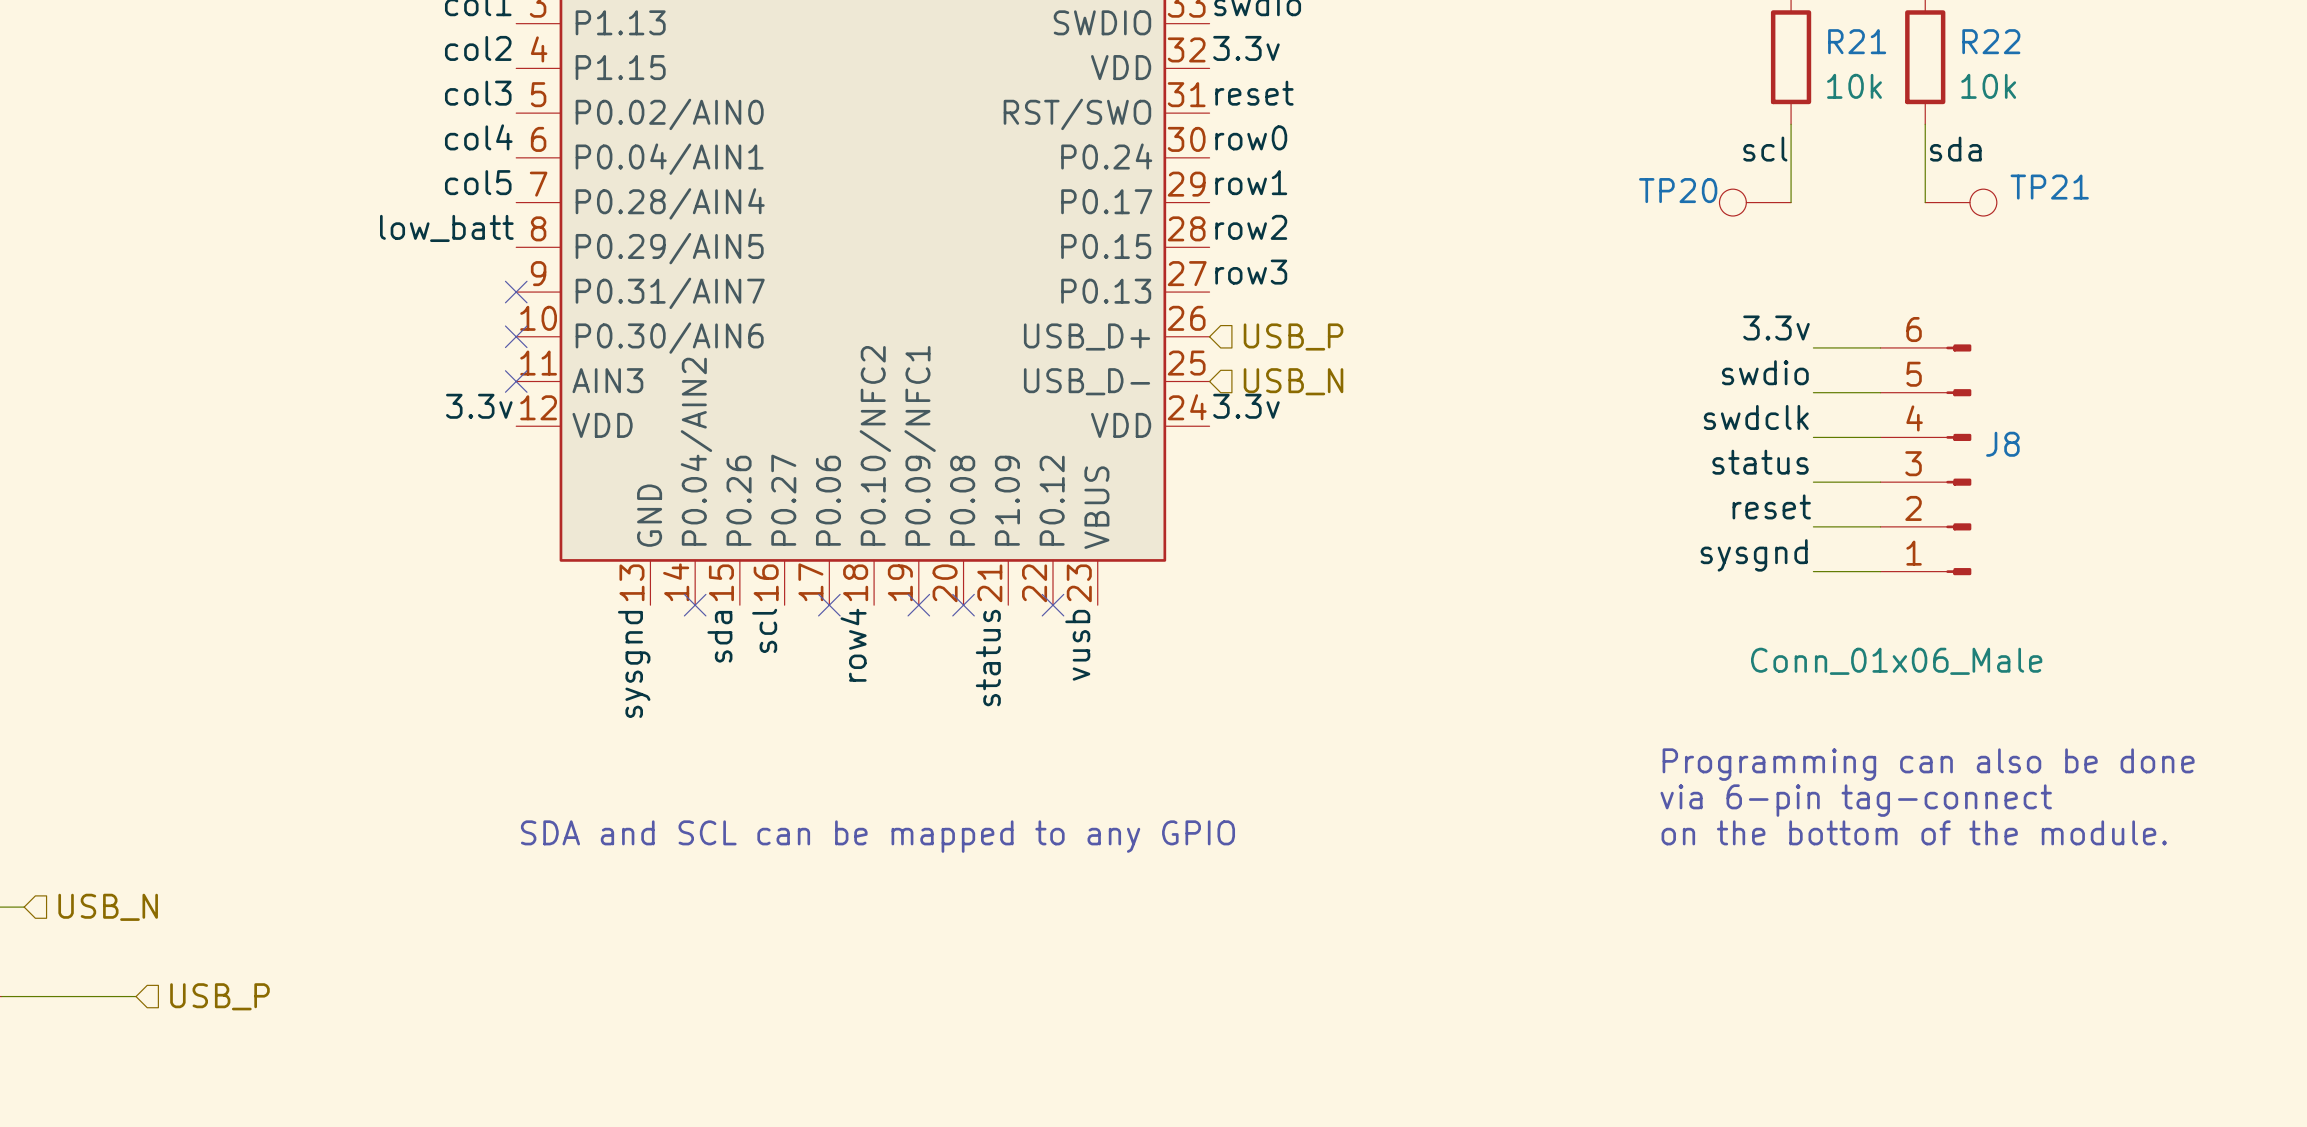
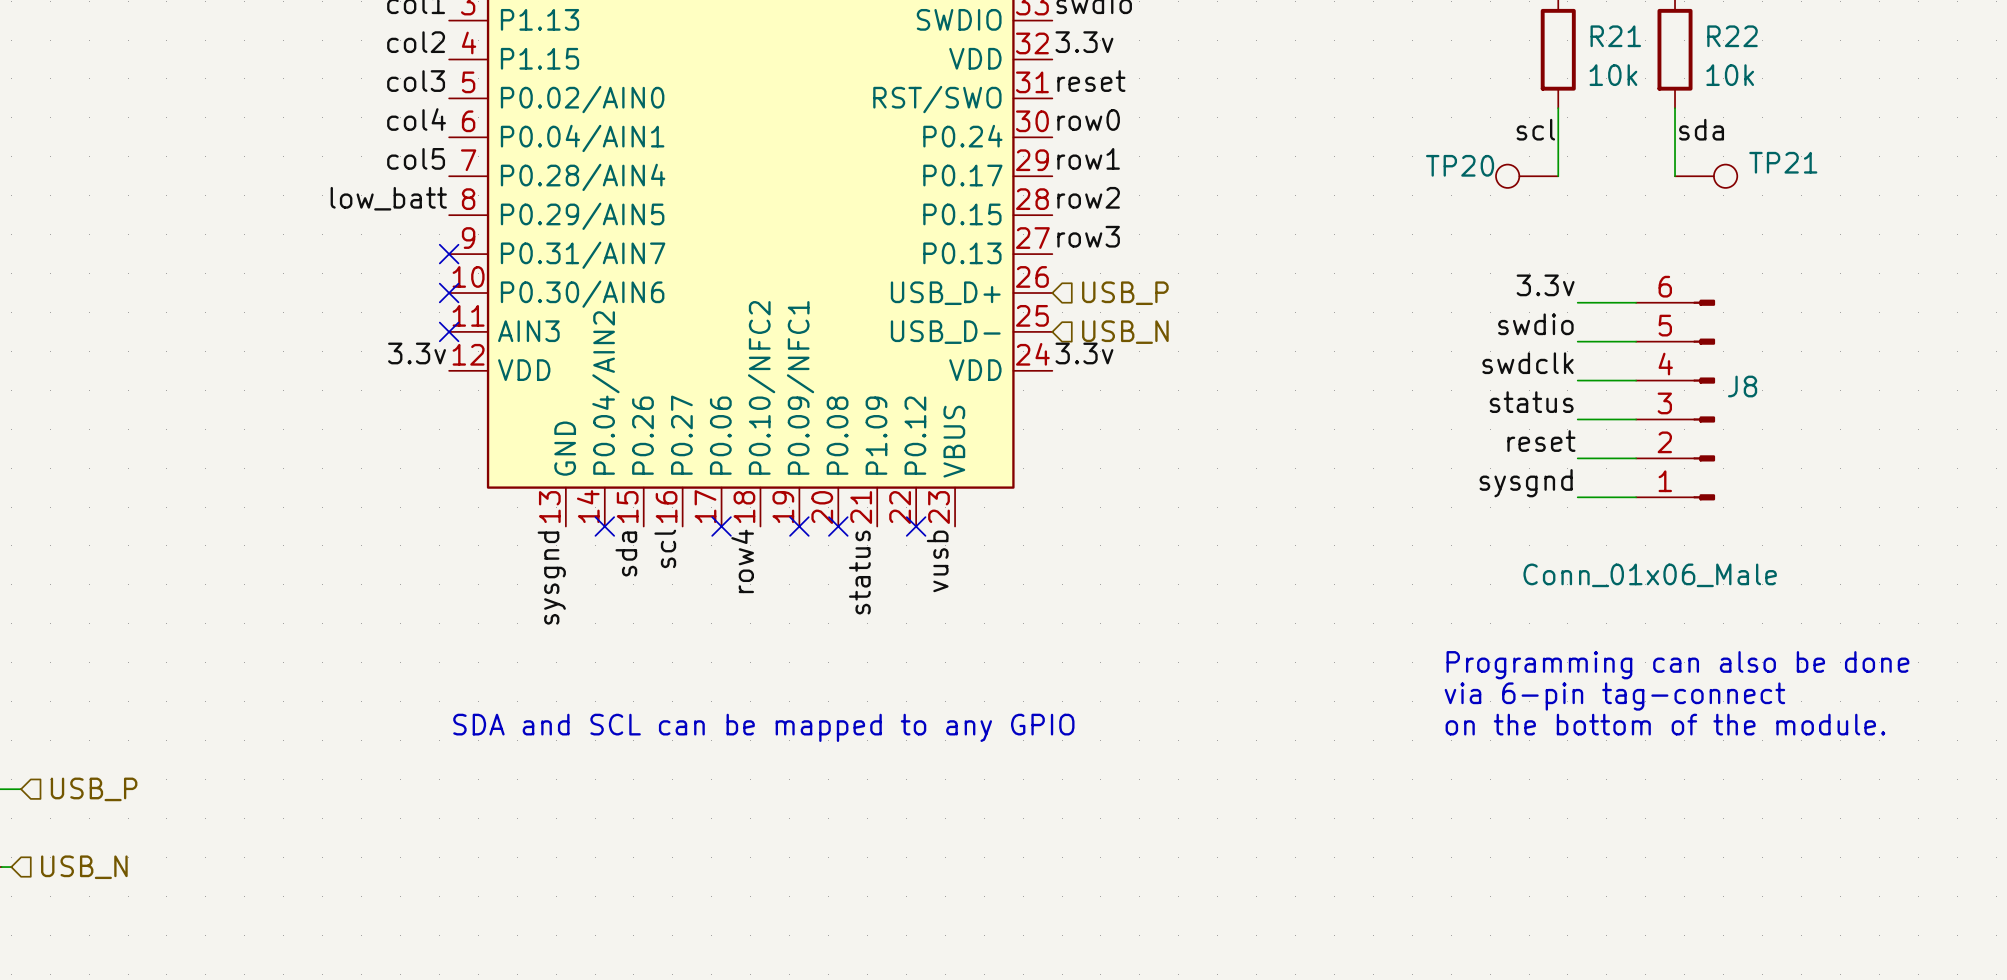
hierarchical label: USB_N (108, 907) -> USB_P (94, 789)
wire: (13, 996) (136, 996) -> none
hierarchical label: USB_P (219, 996) -> USB_N (84, 867)

